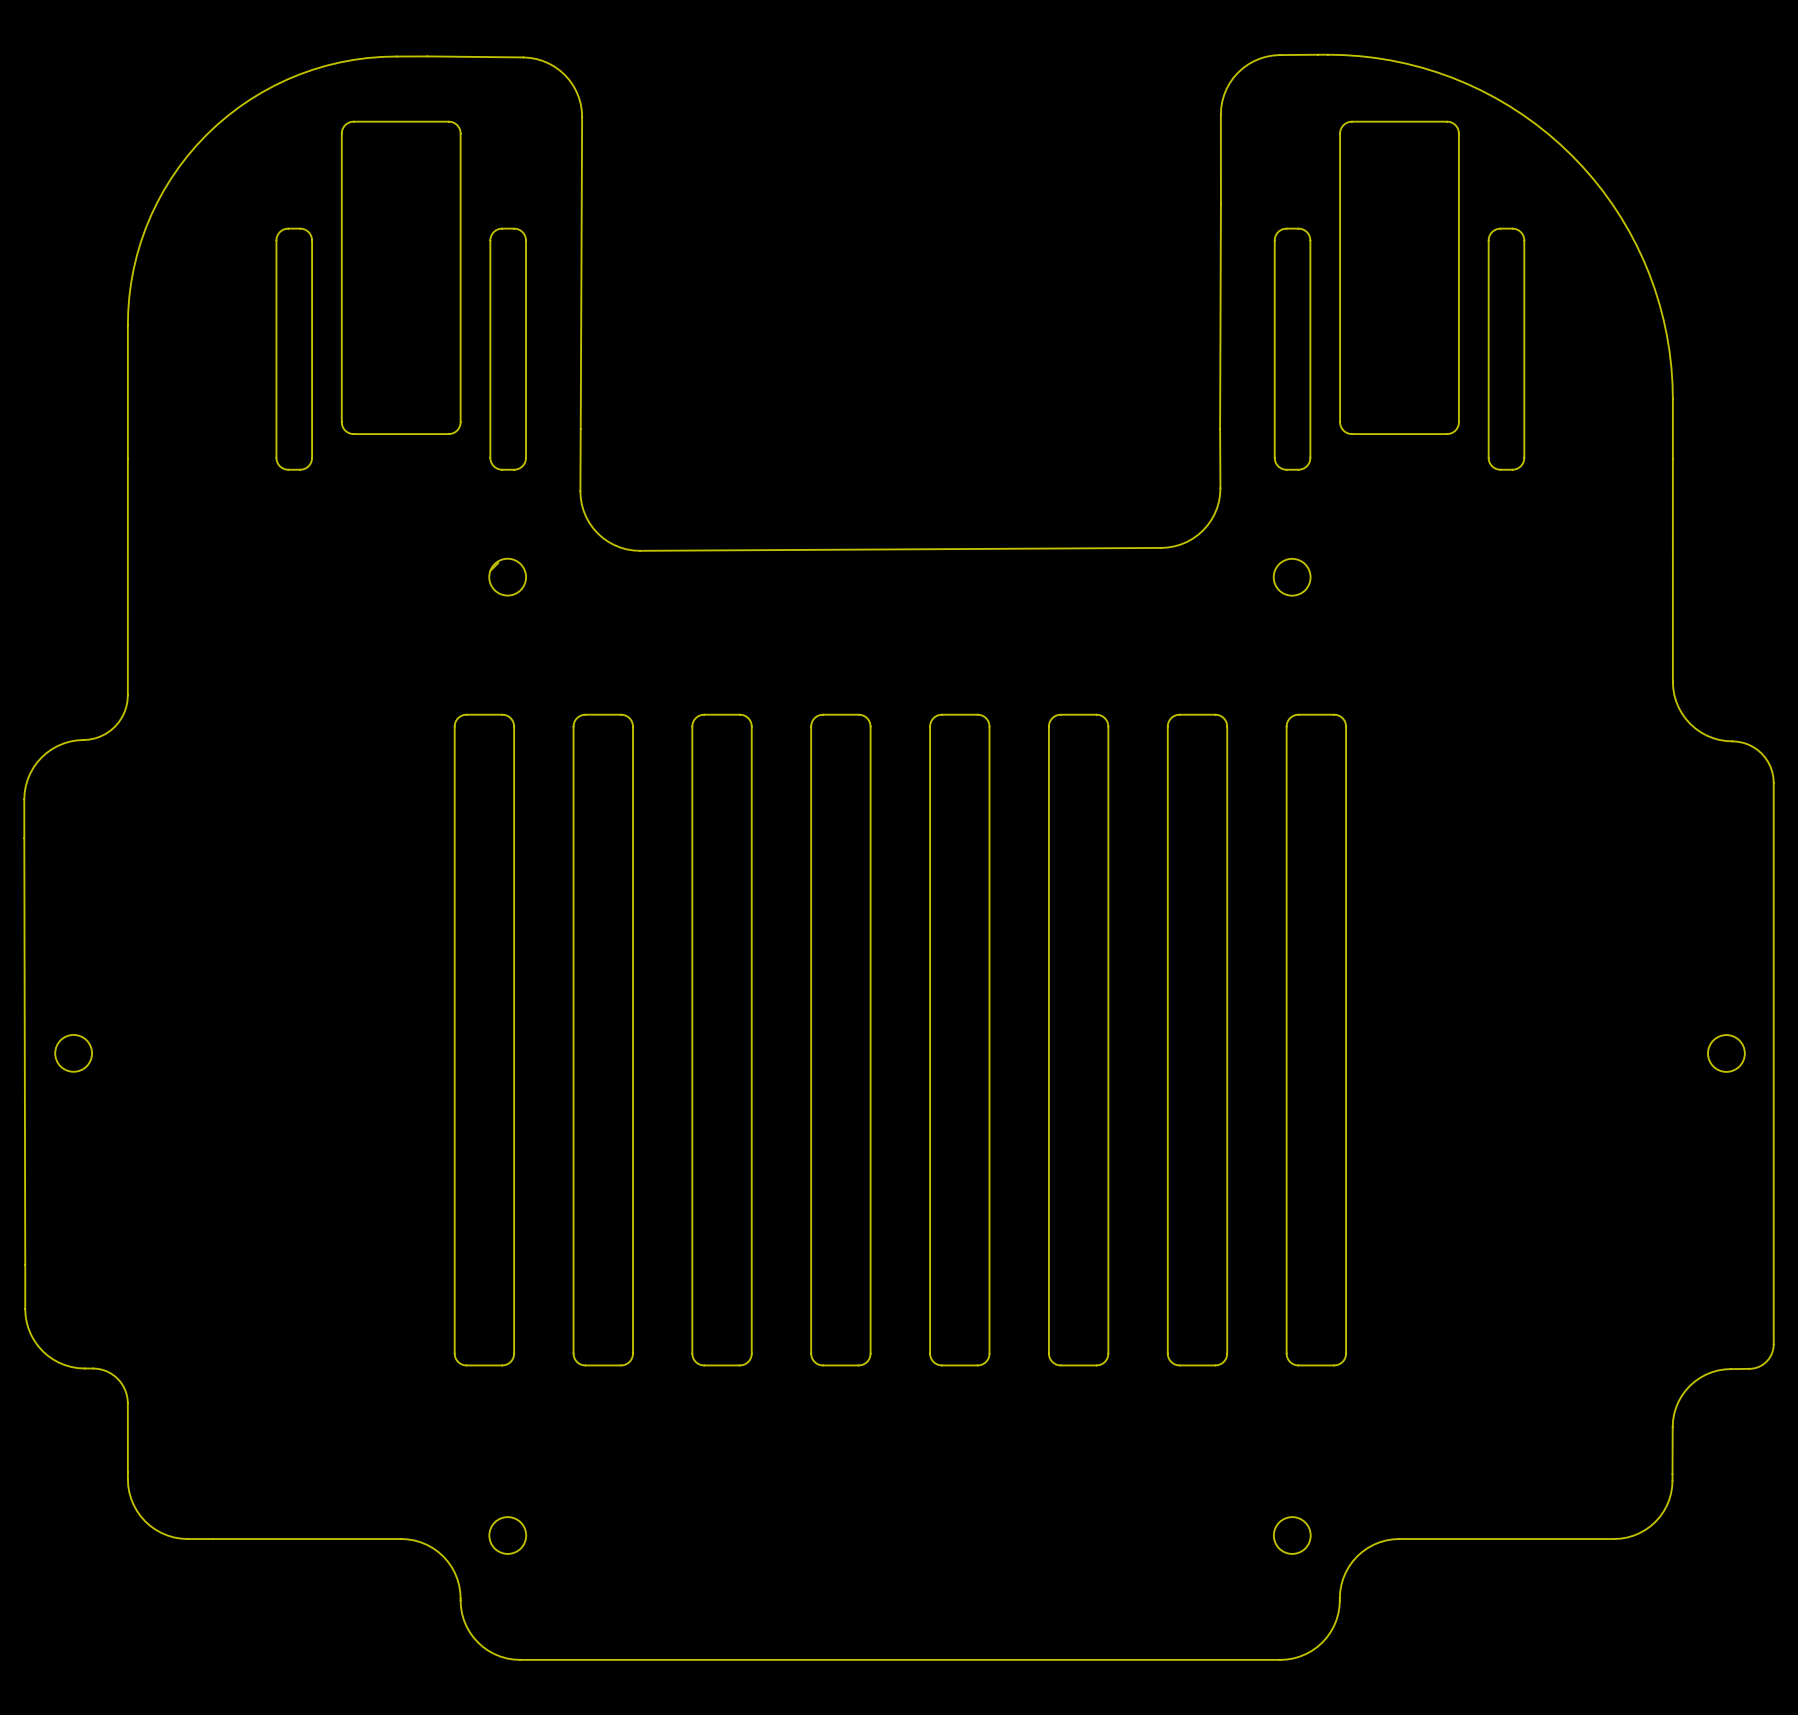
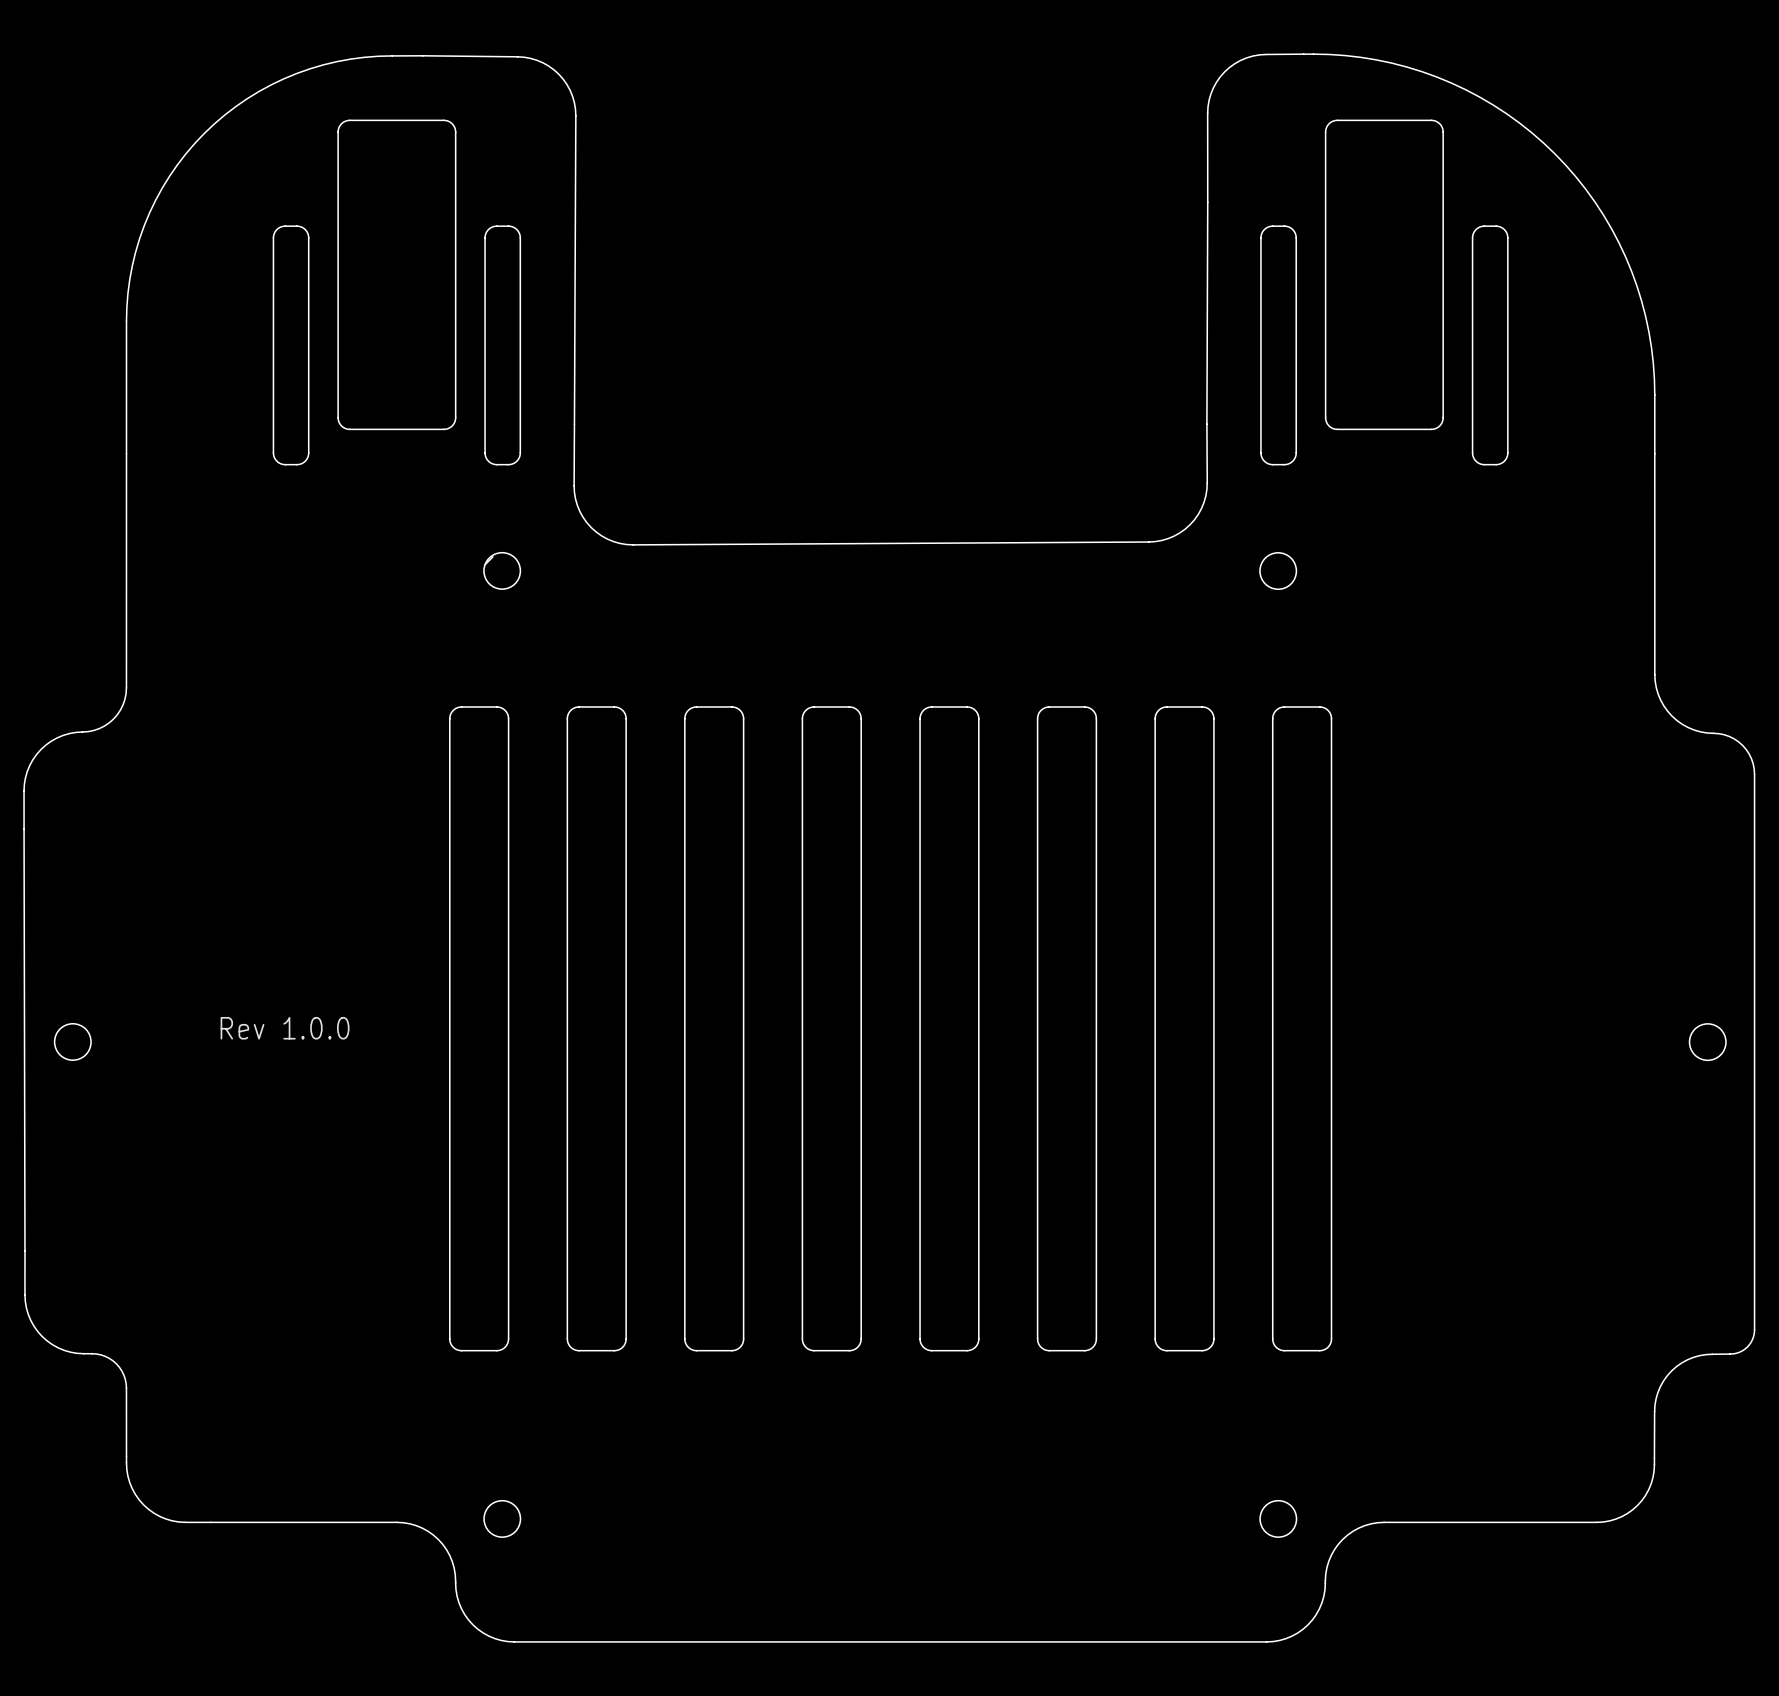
text: none -> Rev 1.0.0 (285, 1028)

